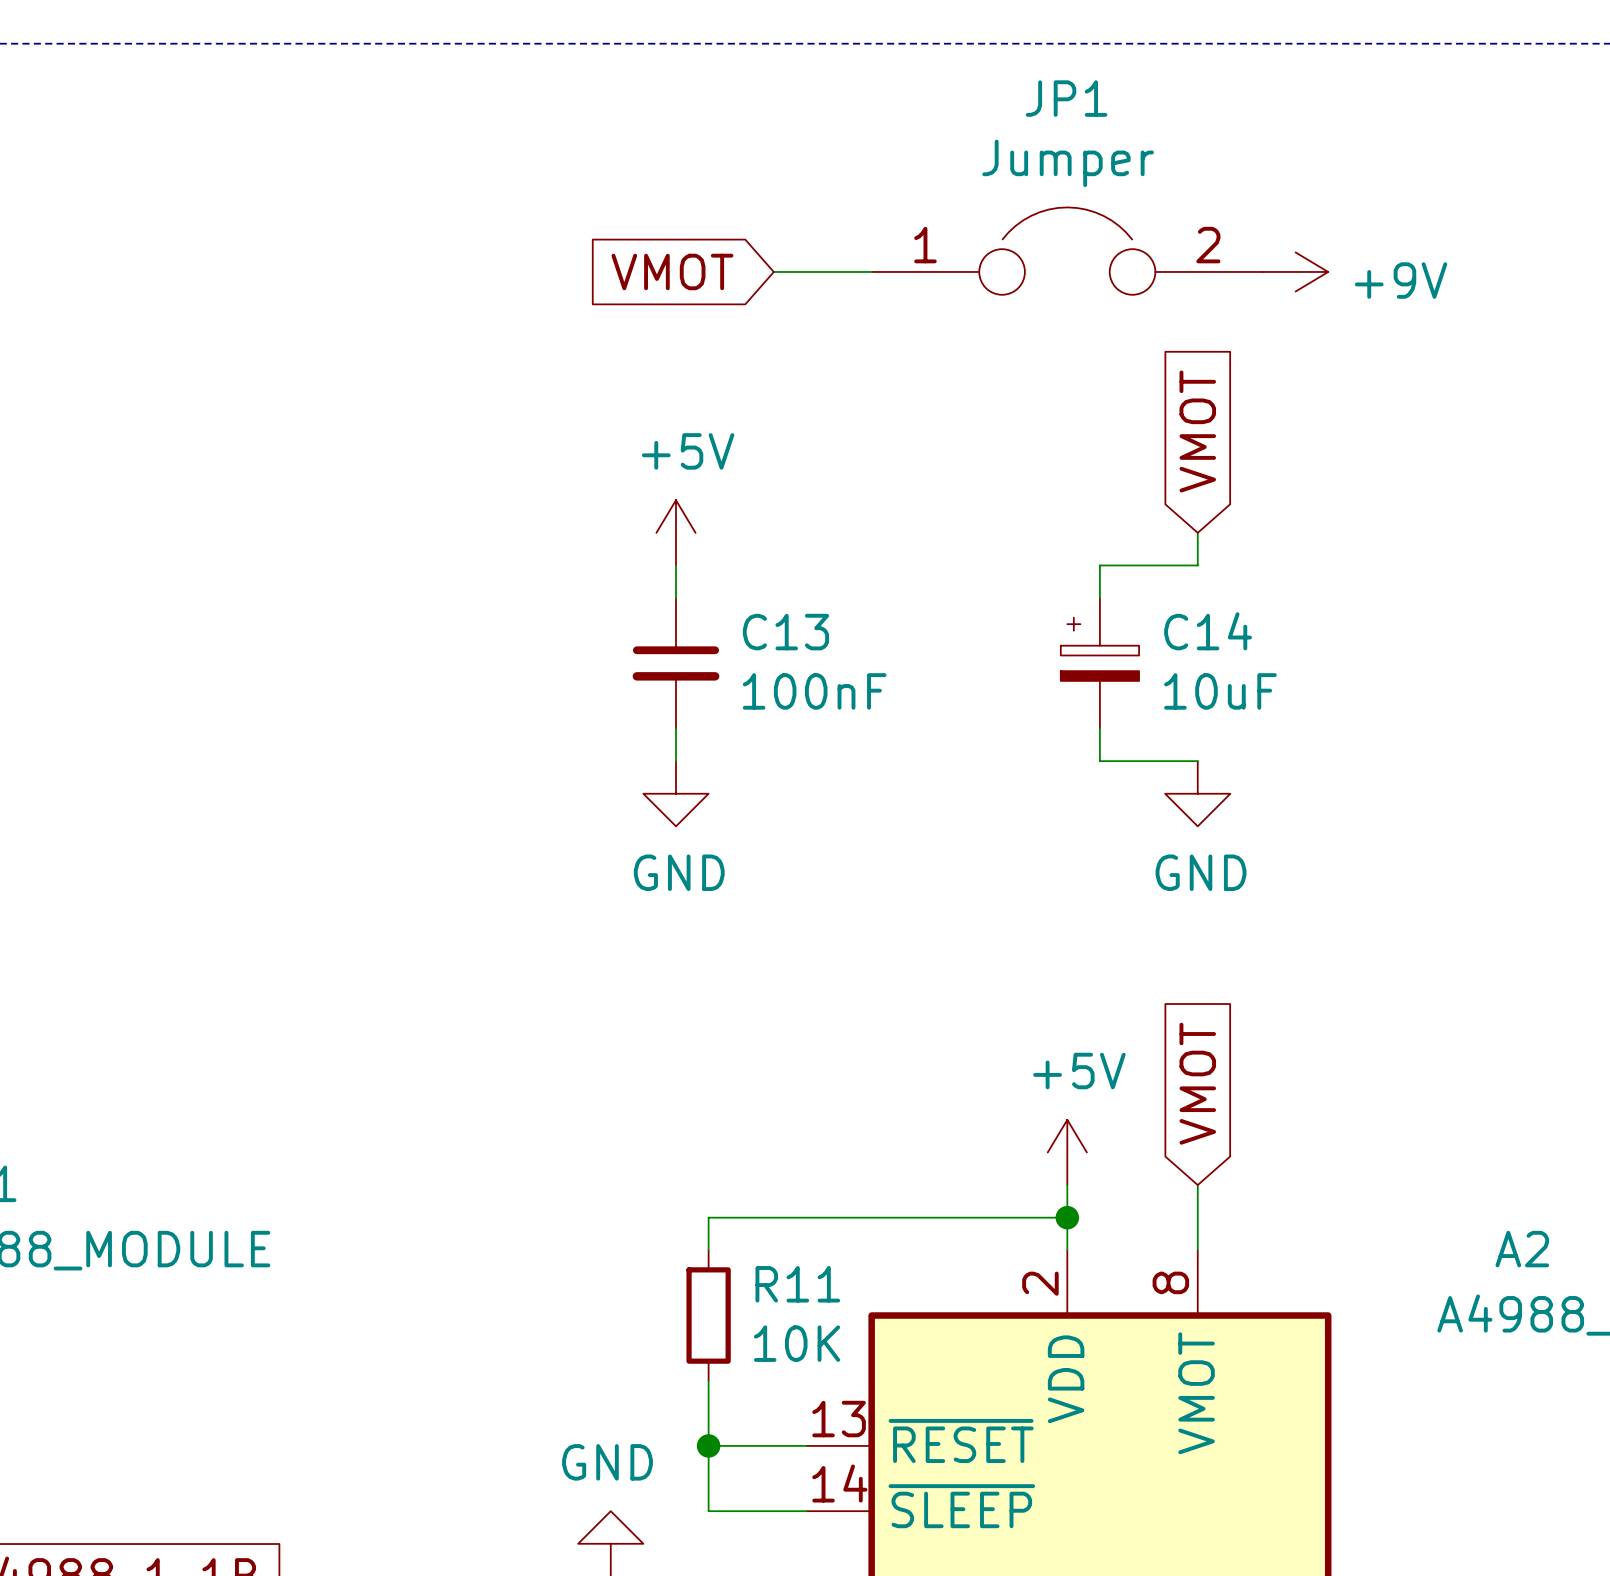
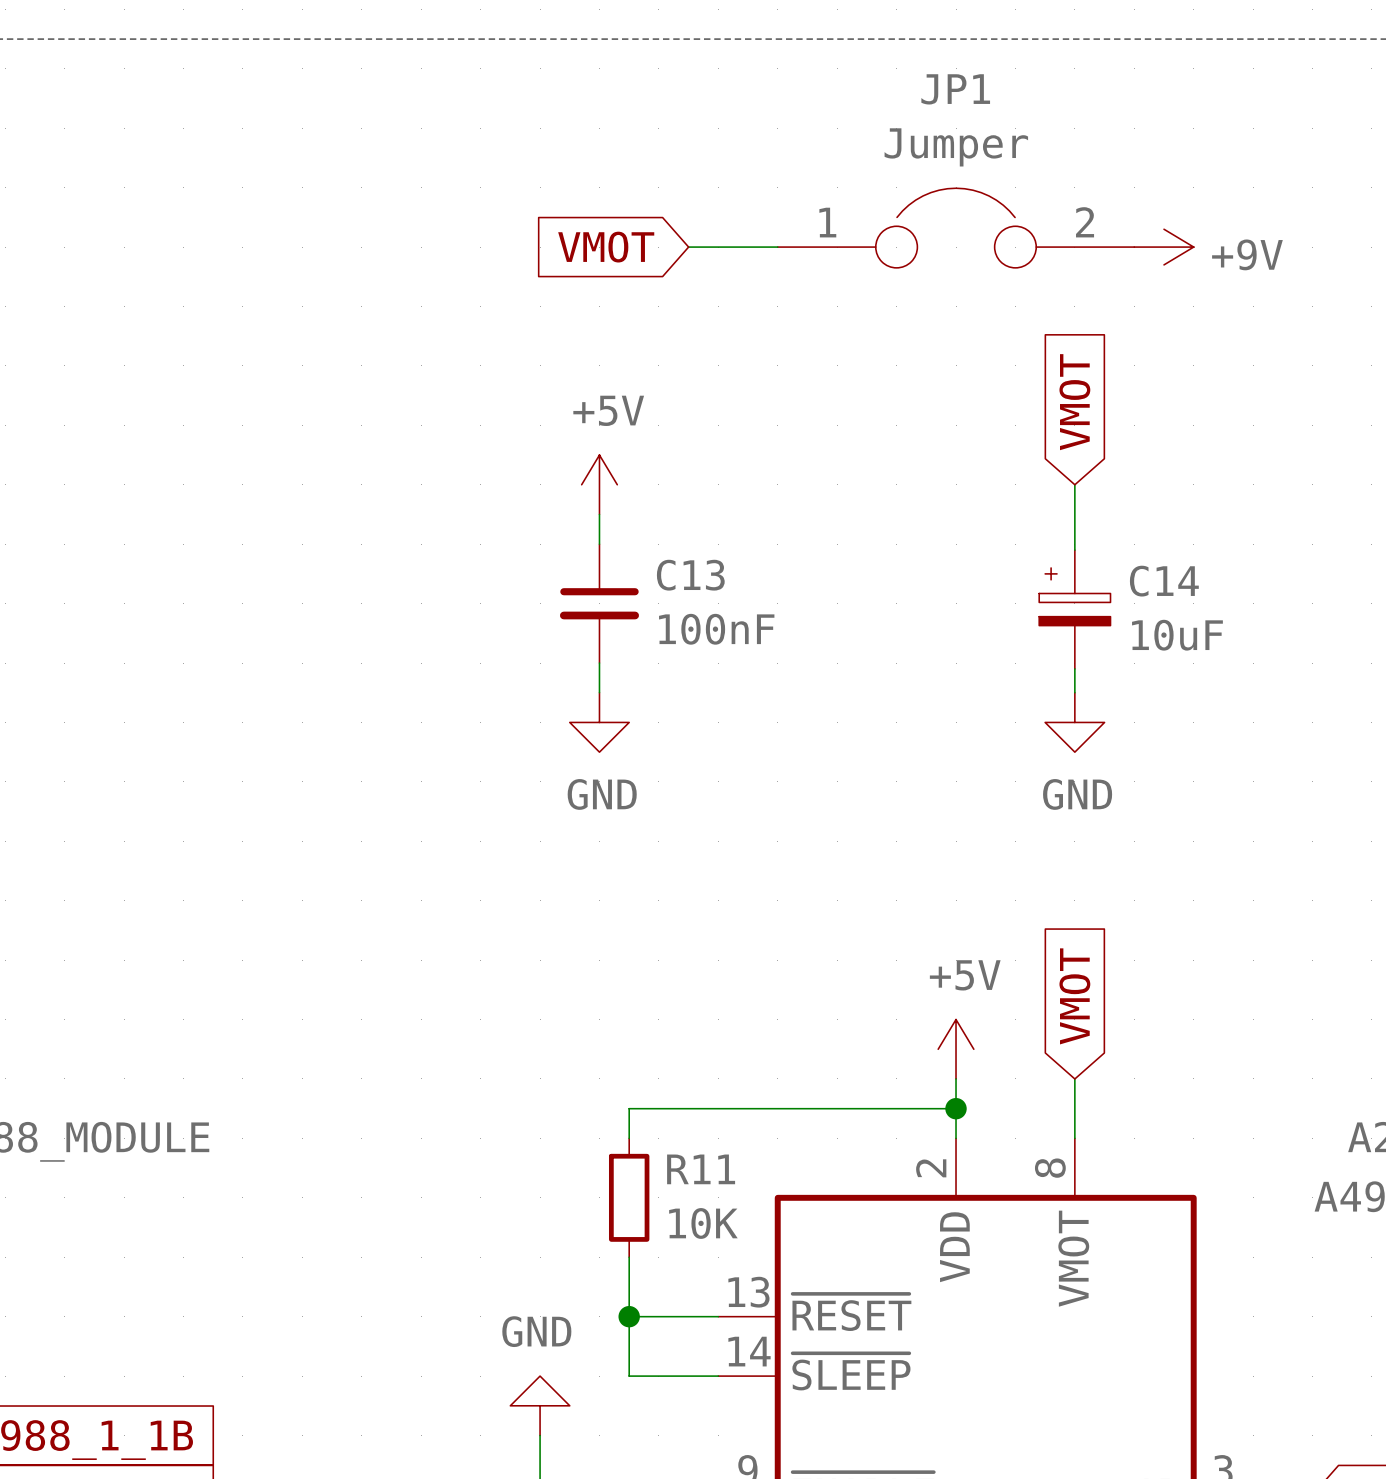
wire: (1197, 565) (1099, 565) (1099, 598) -> (1074, 514) (1074, 550)
C14 position: (1099, 663) -> (1074, 609)
wire: (1099, 728) (1099, 761) (1197, 761) -> (1074, 668) (1074, 692)

